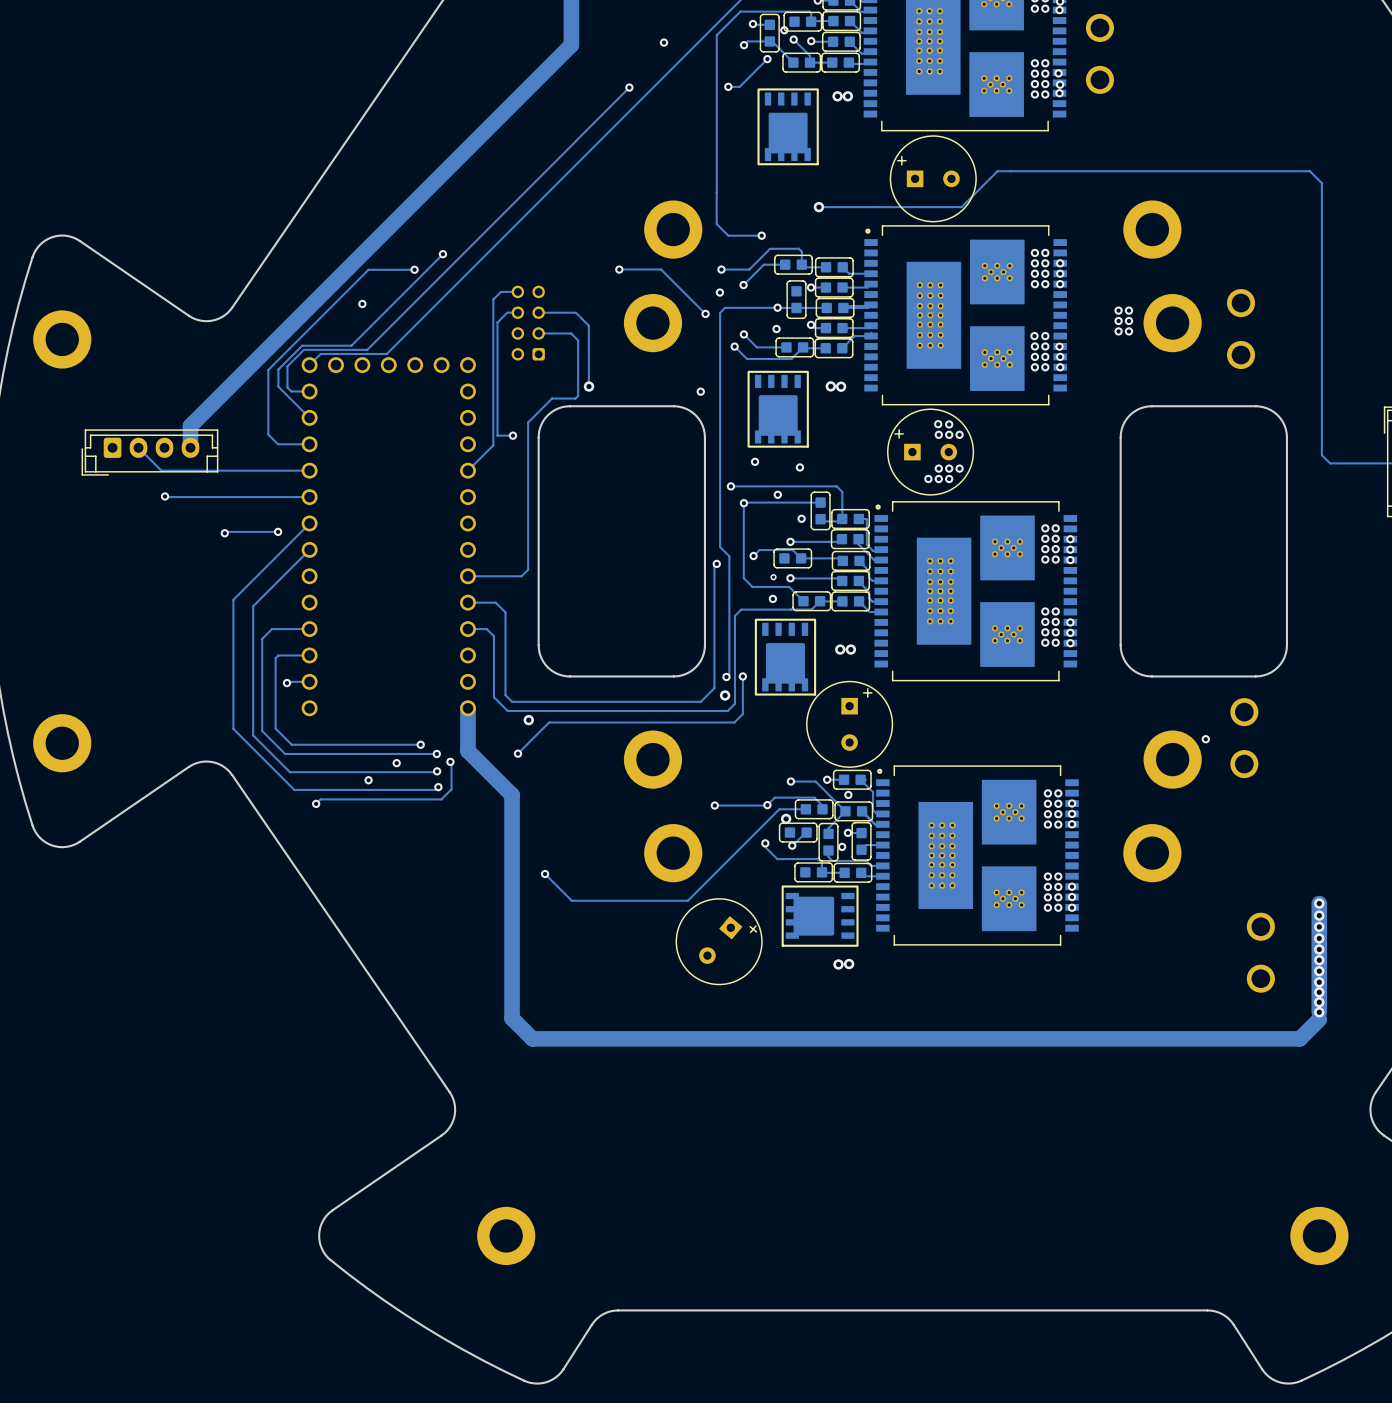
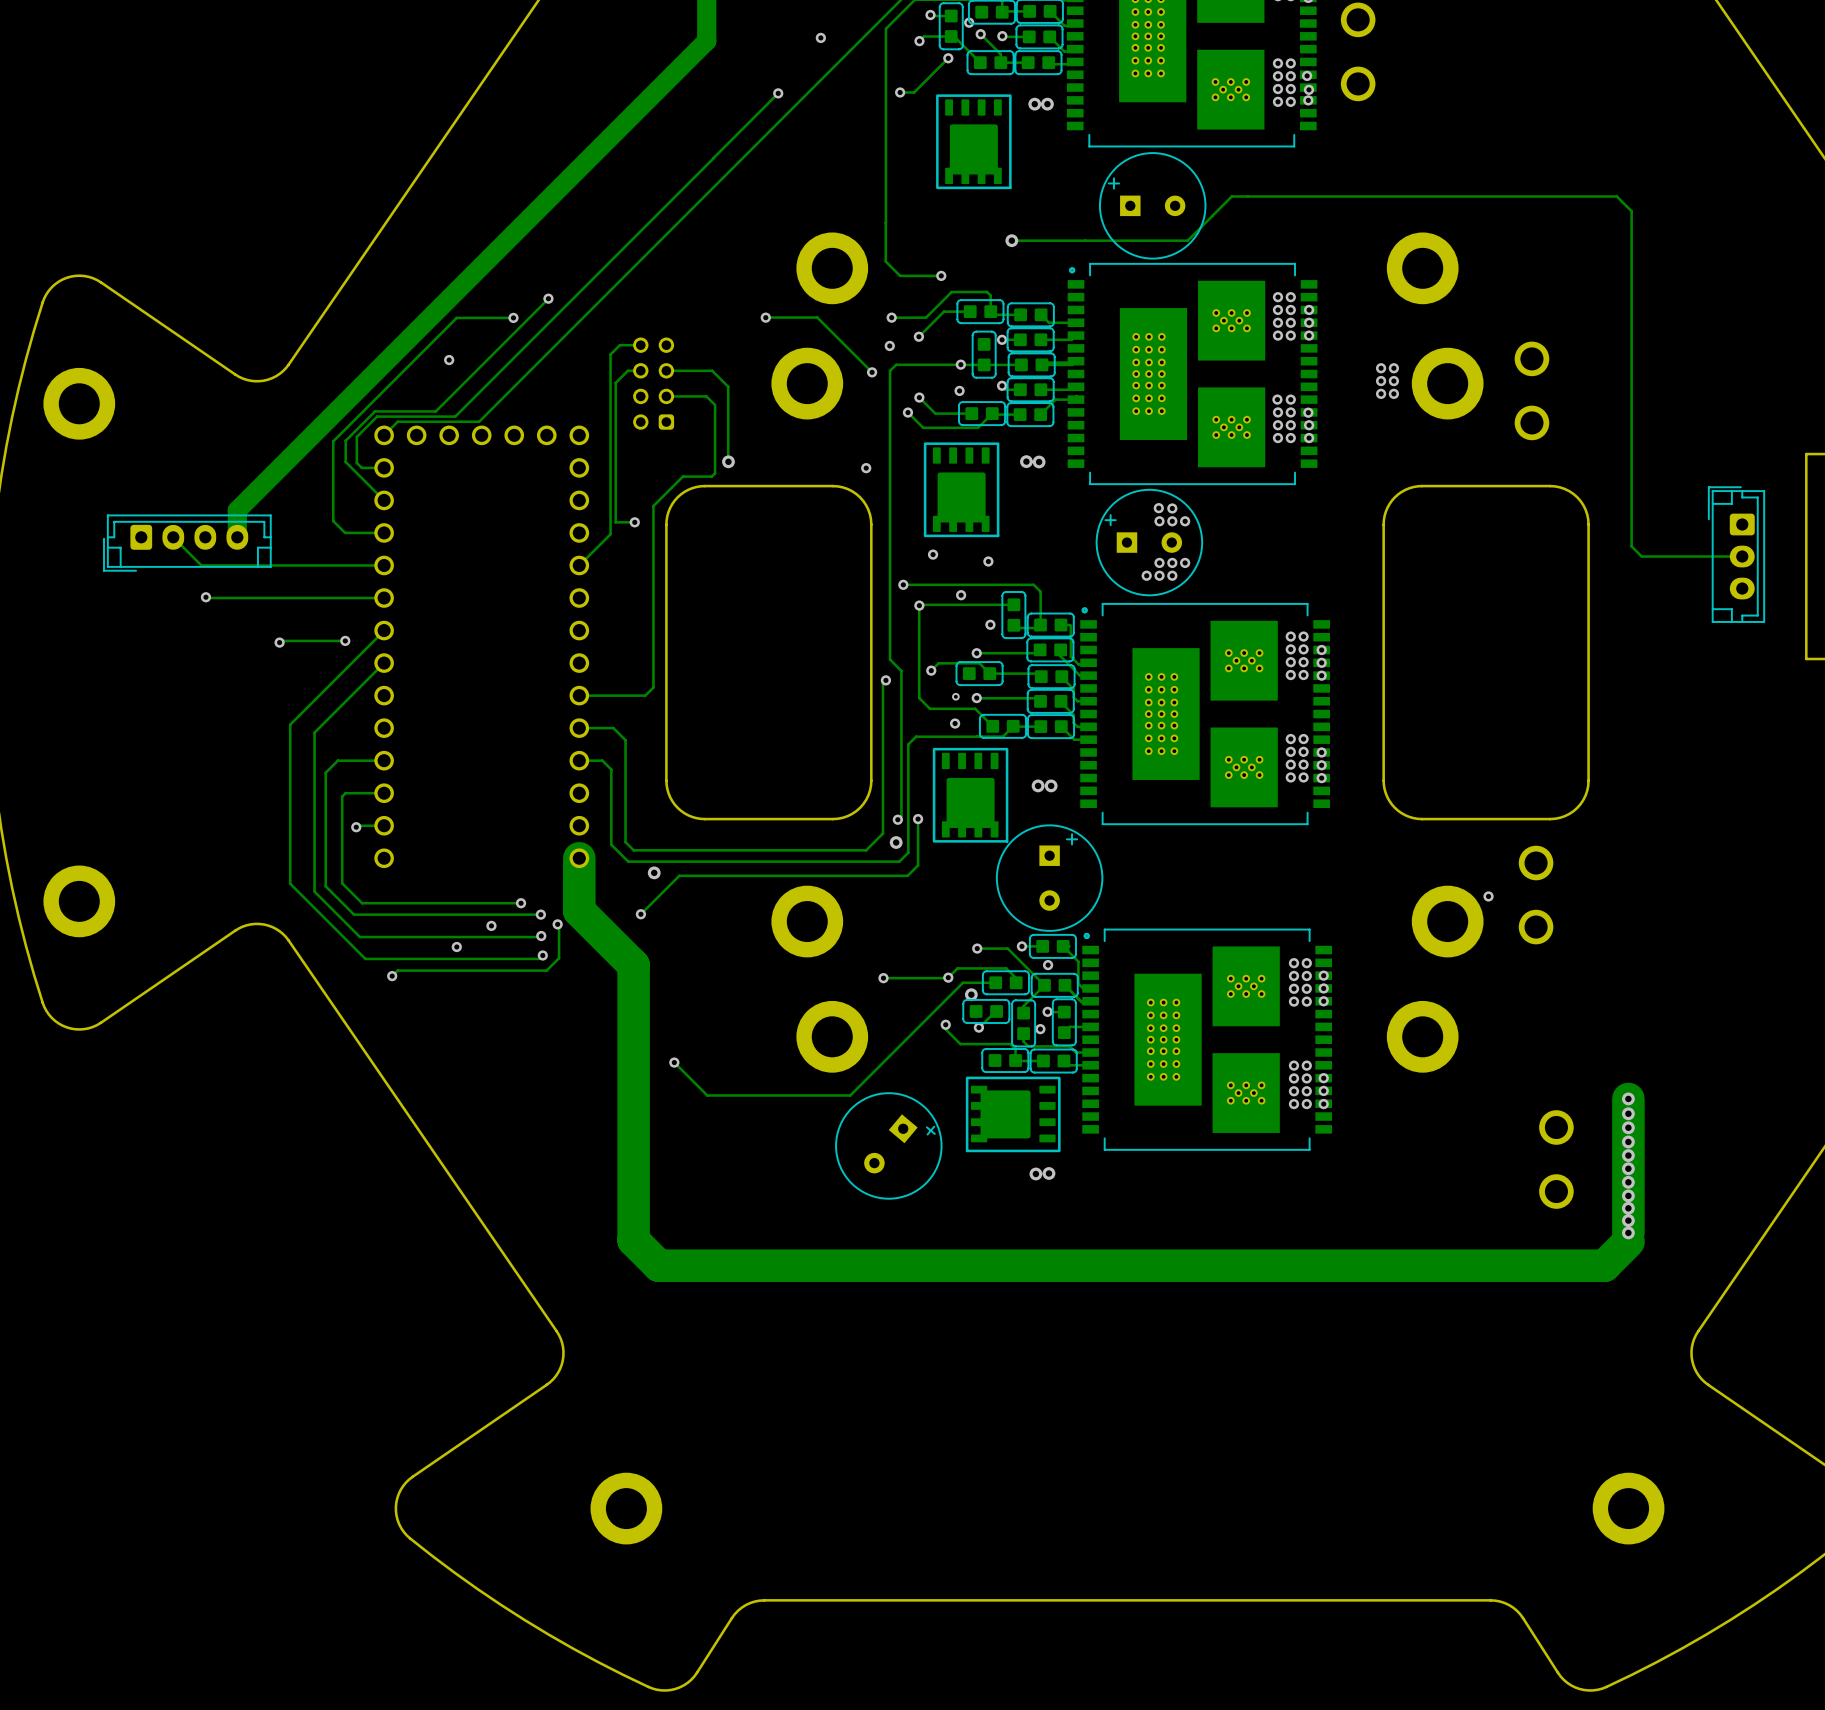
track width: thin (467, 708) (467, 750) (512, 795) (512, 1018) (532, 1038) (1299, 1038) (1319, 1019) -> thick (579, 858) (579, 910) (633, 965) (633, 1240) (658, 1265) (1604, 1265) (1628, 1241)
track width: thin (1319, 903) (1319, 1012) -> thick (1628, 1098) (1628, 1232)

